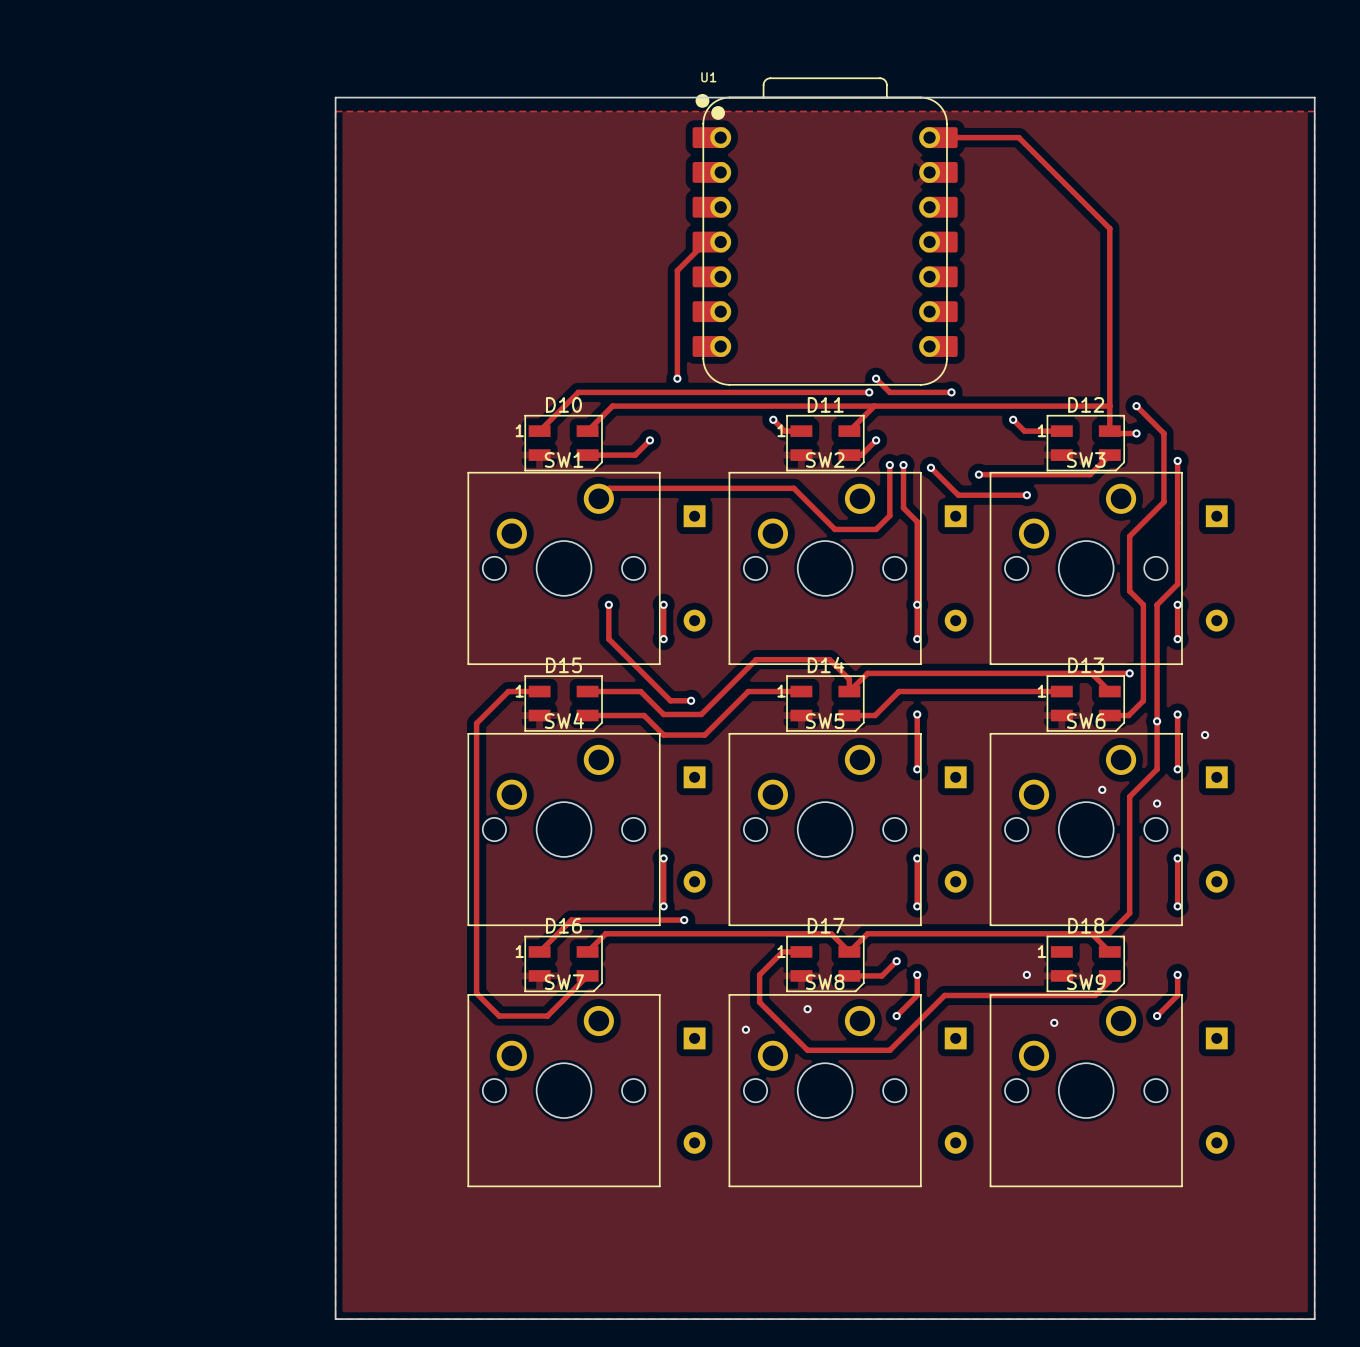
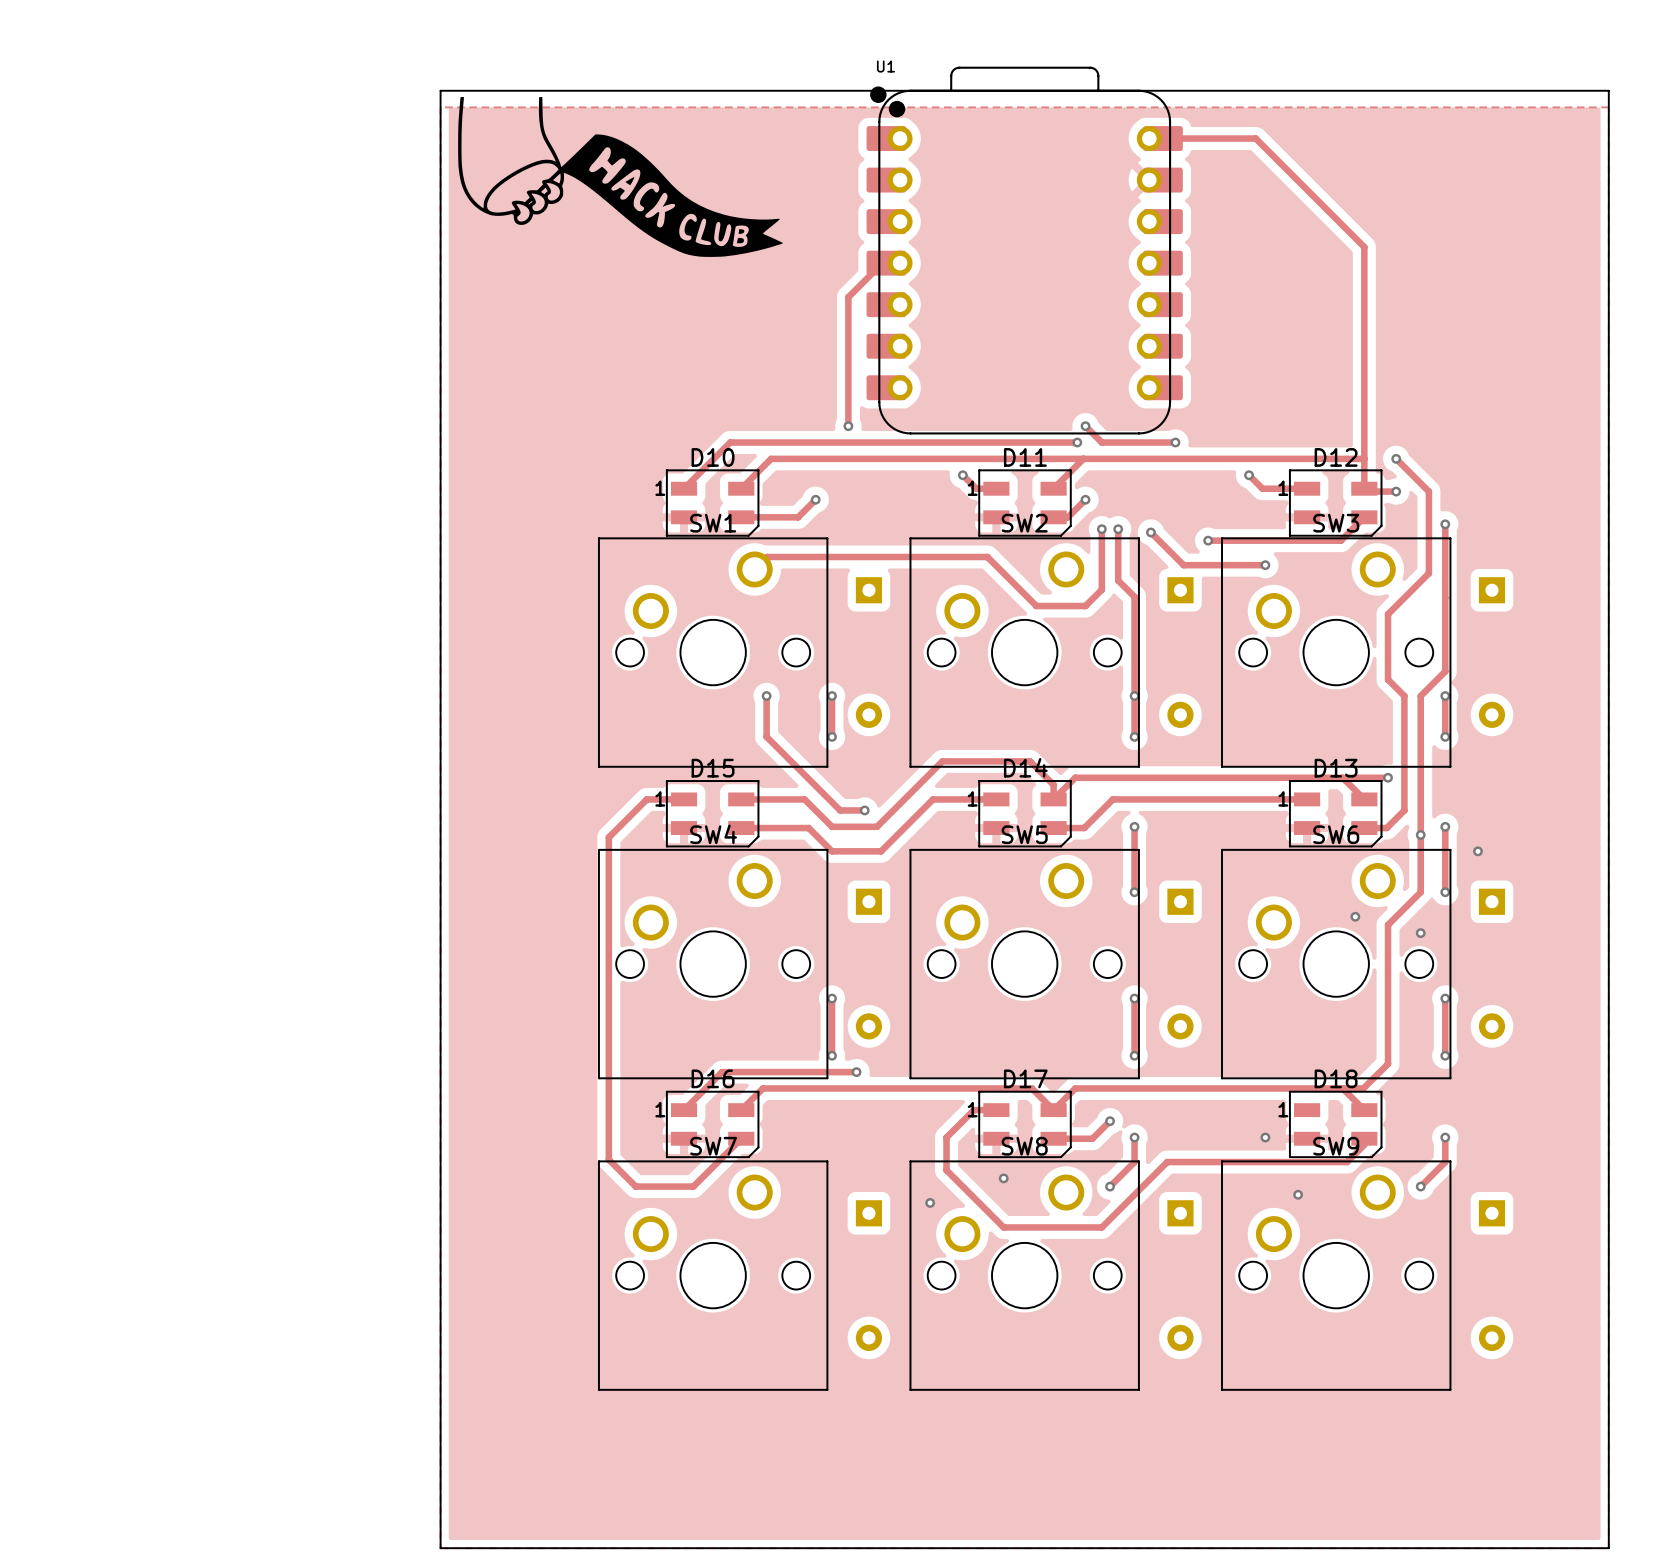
drawing: none -> [458, 97, 783, 257]

